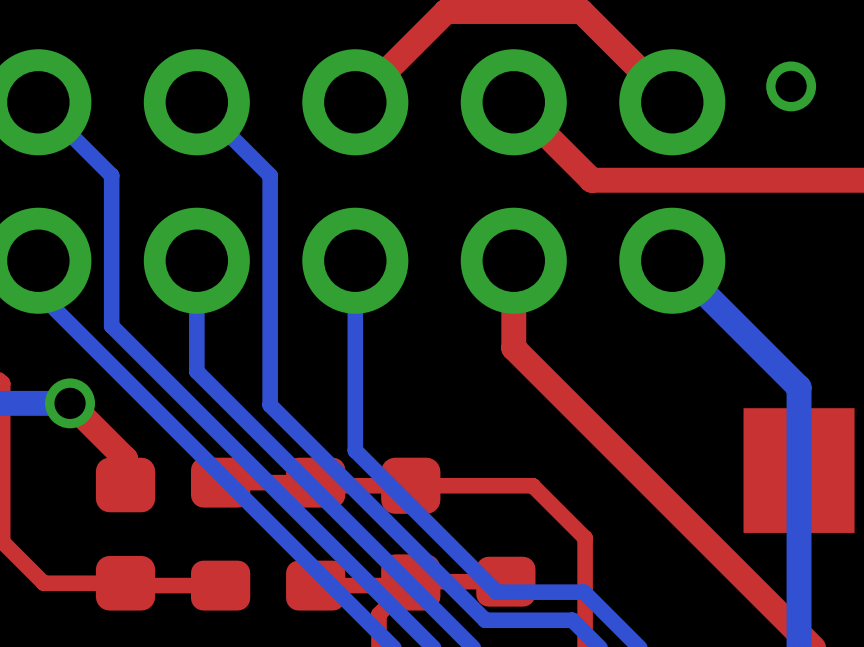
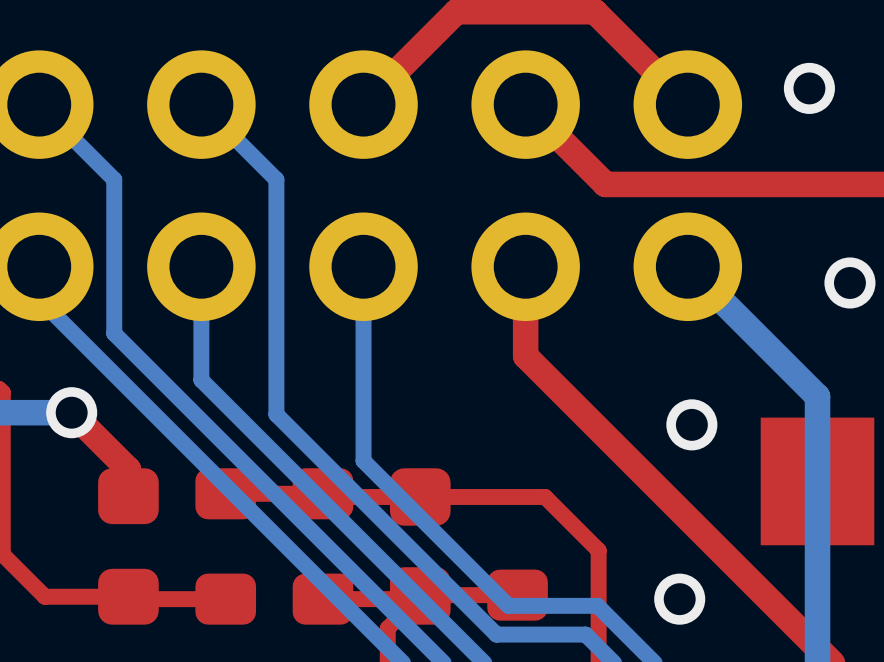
via: none -> (849, 282)
via: none -> (691, 424)
via: none -> (679, 599)

